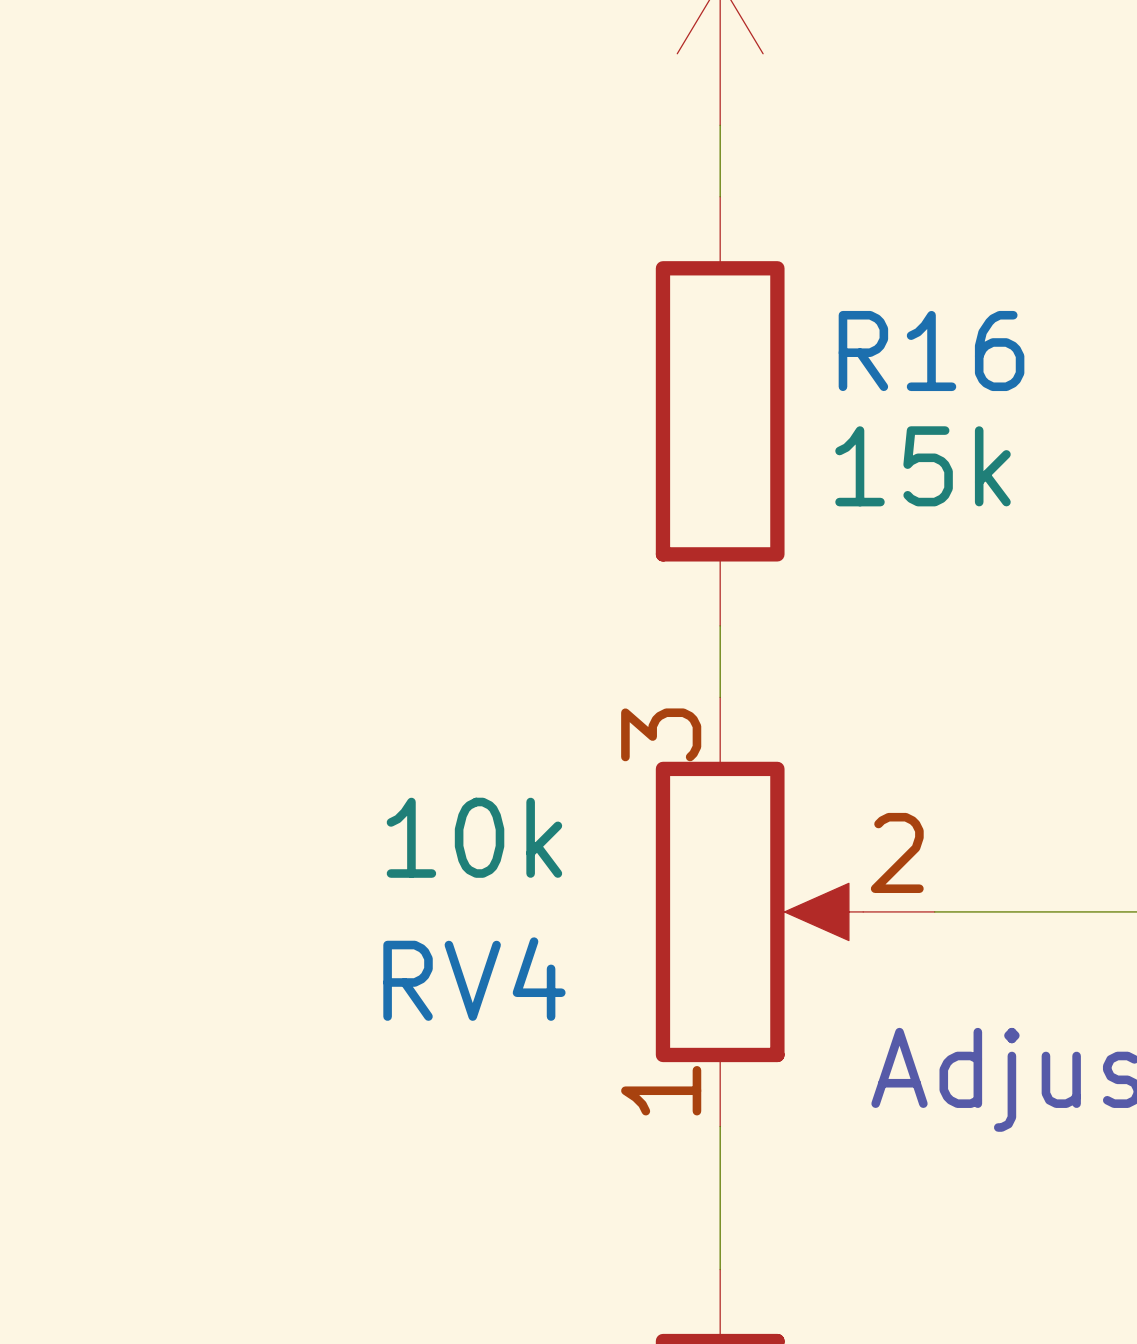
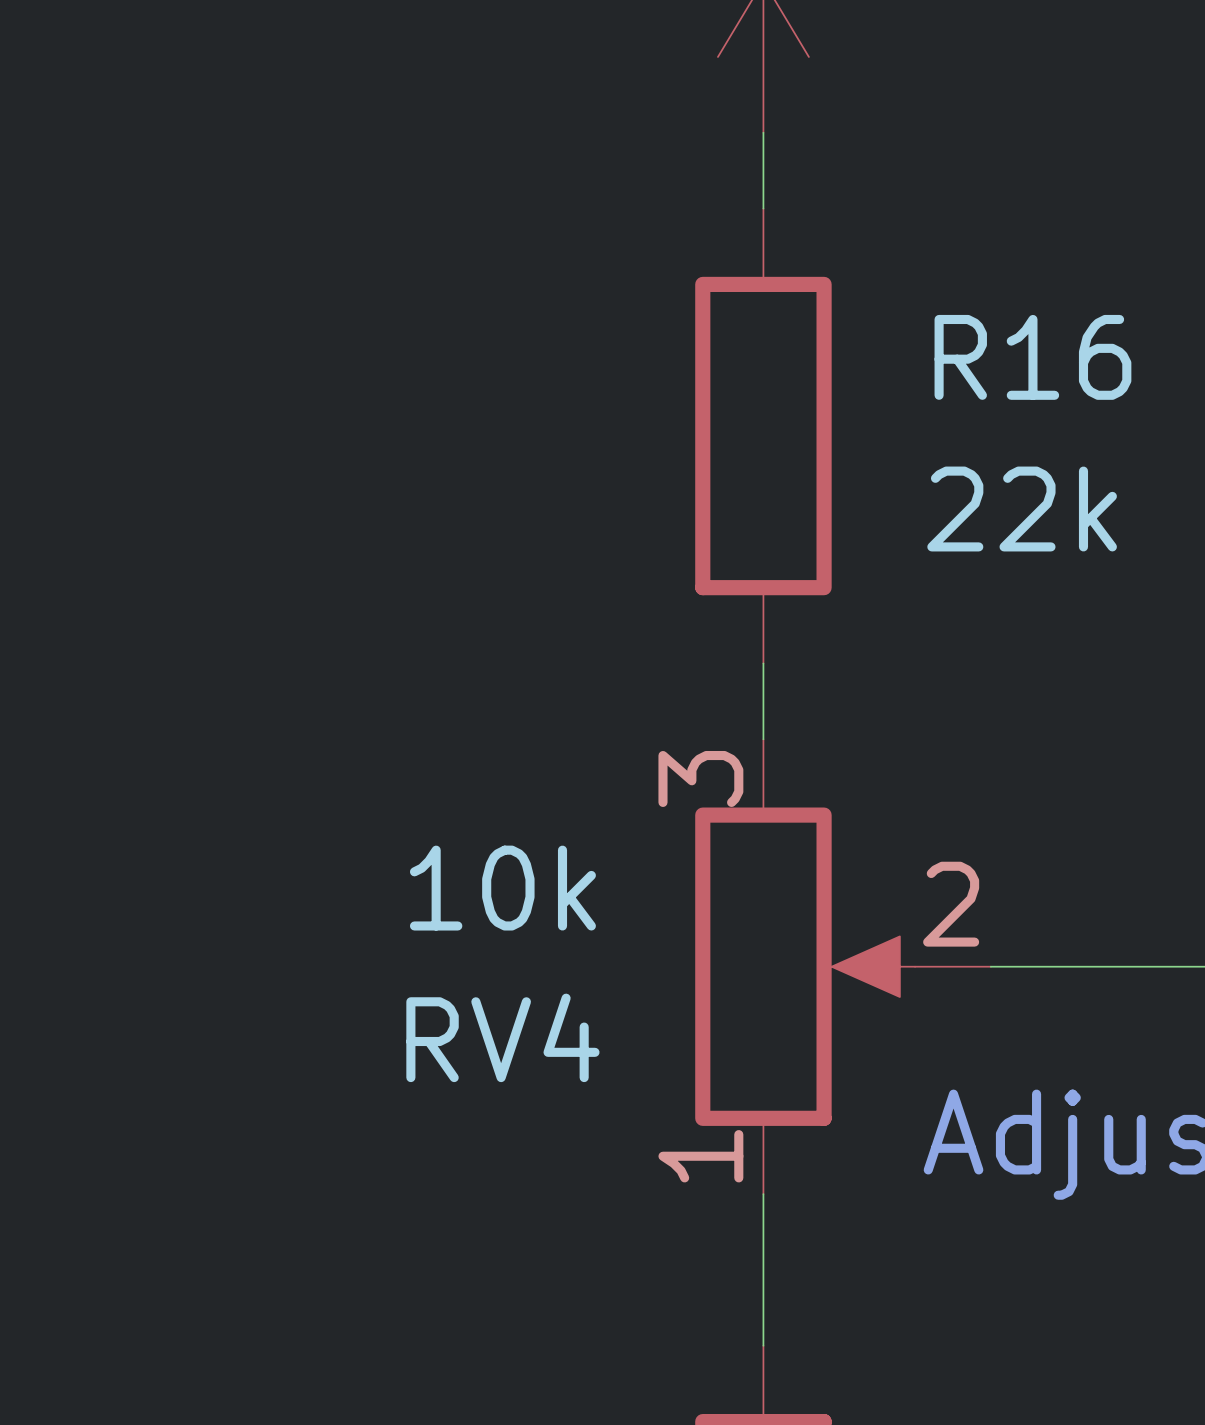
R16 name position: R16 (931, 350) -> R16 (1032, 357)
R16 value: 15k (923, 466) -> 22k (1022, 509)

